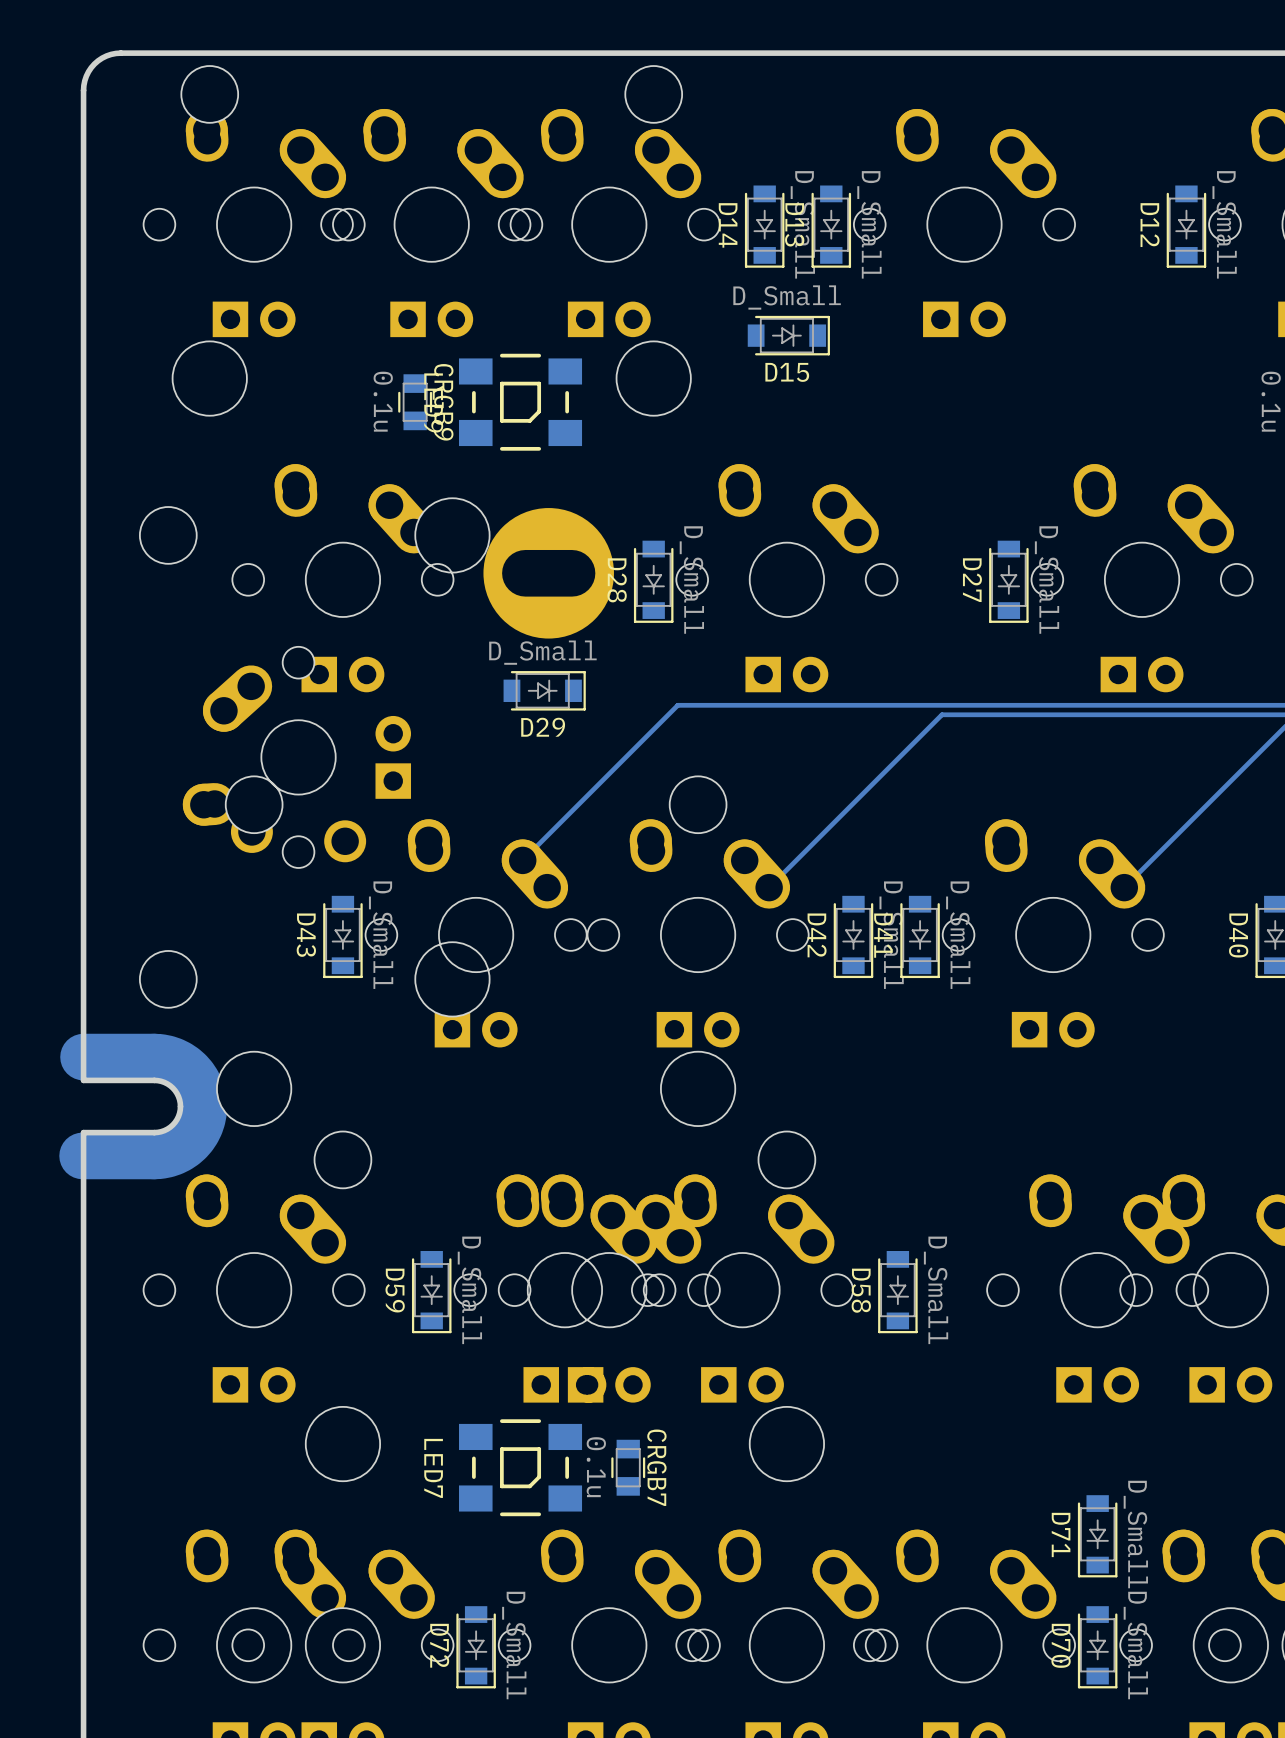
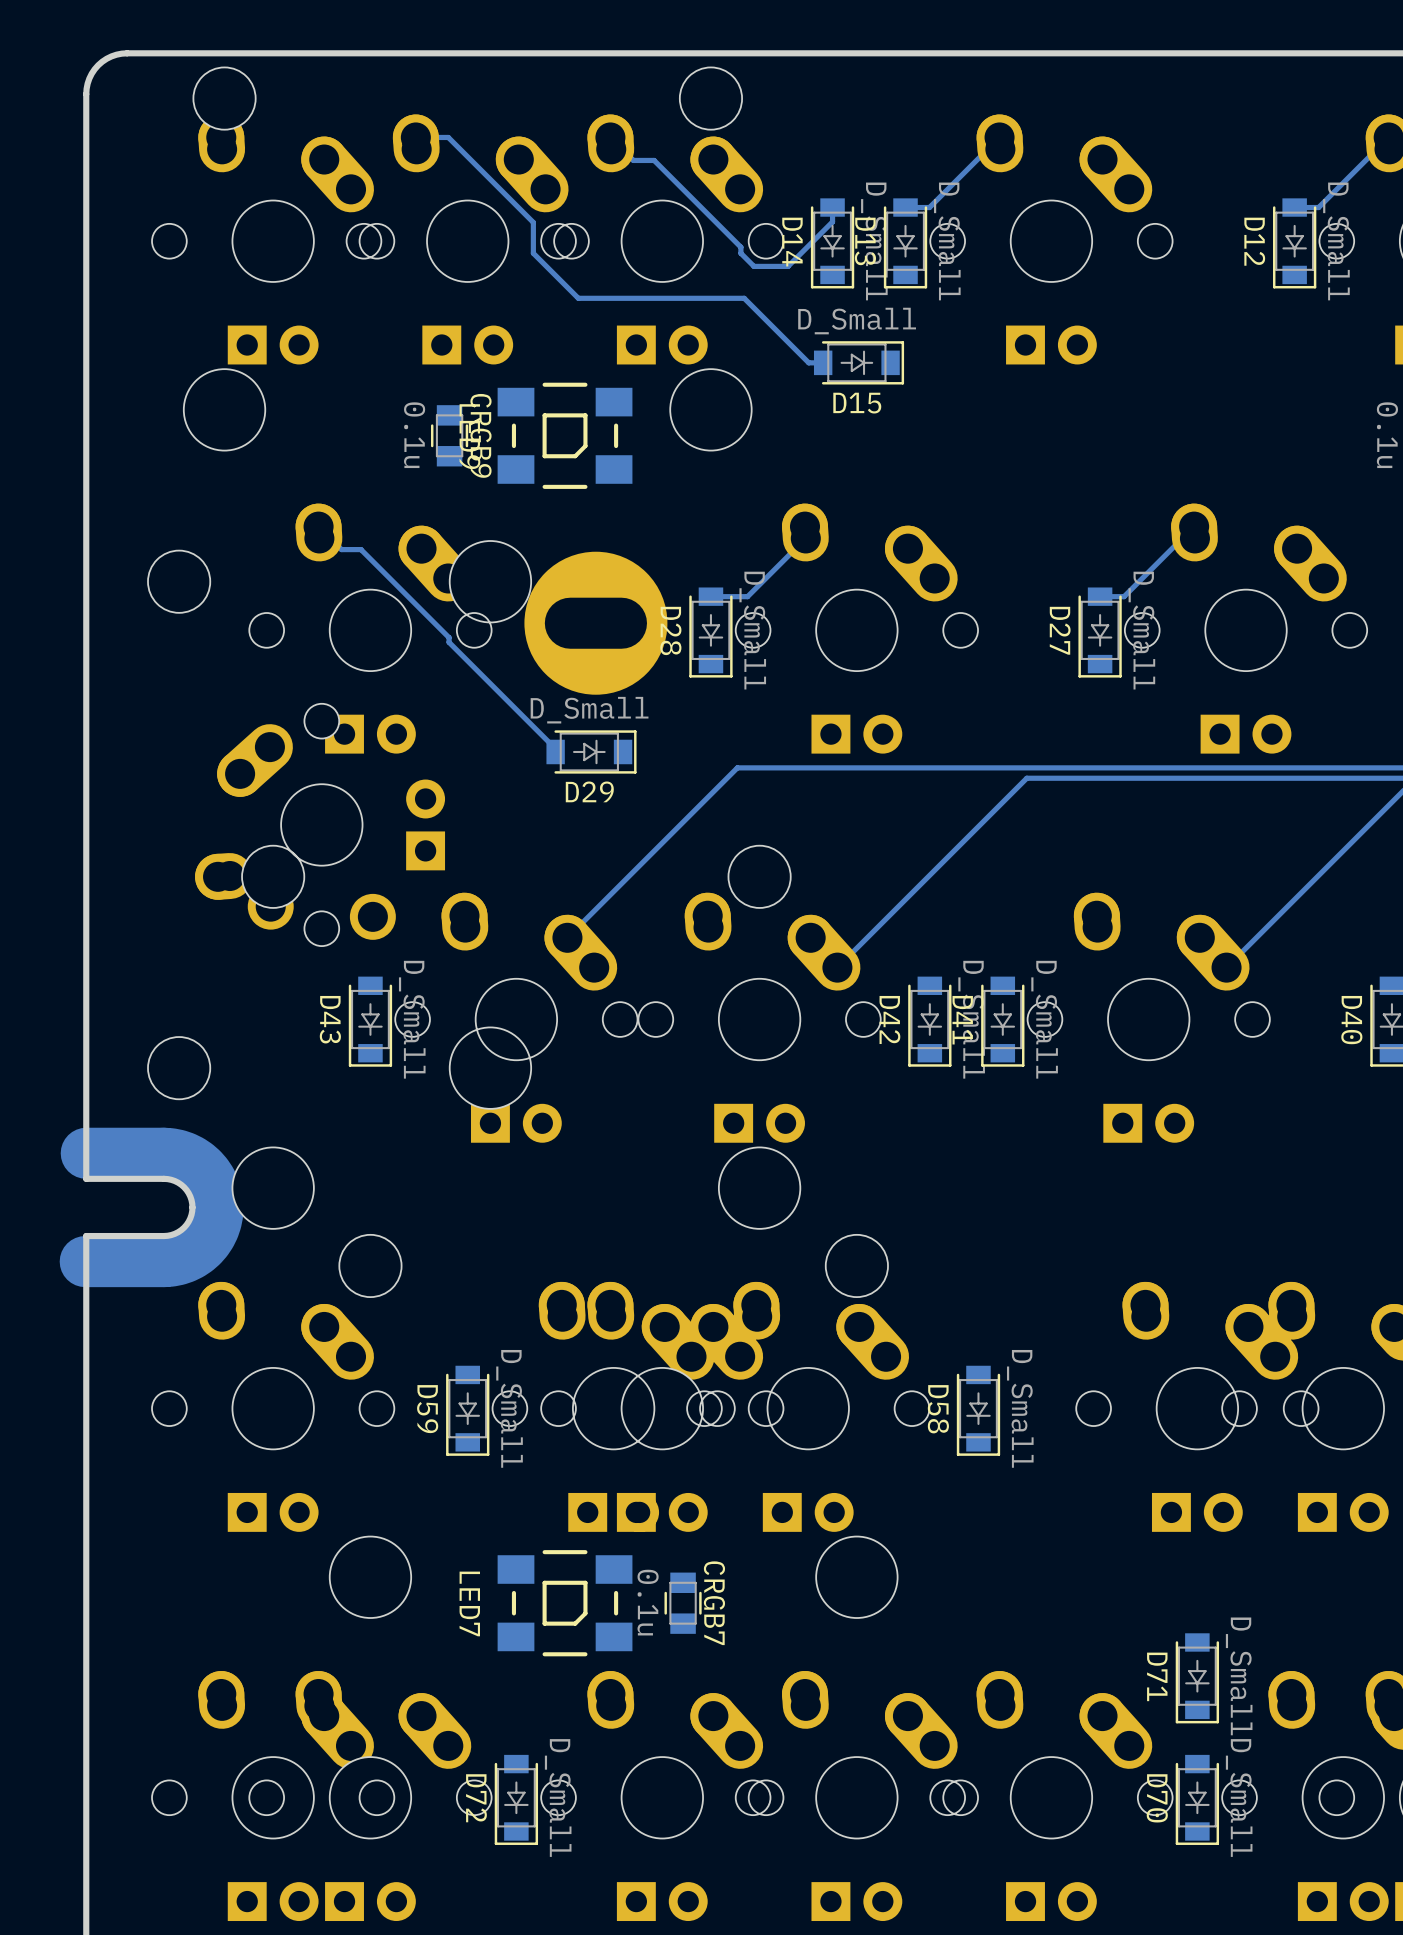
track: none -> (415, 137) (448, 137) (533, 222) (533, 253) (578, 298) (744, 298) (808, 362) (823, 362)
track: none -> (610, 137) (633, 160) (654, 160) (740, 247) (740, 253) (754, 266) (788, 266) (832, 221) (832, 207)
track: none -> (999, 137) (929, 207) (905, 207)
track: none -> (1388, 137) (1318, 207) (1294, 207)
track: none -> (318, 526) (341, 549) (361, 549) (449, 637) (449, 642) (555, 748) (555, 751)
track: none -> (1194, 526) (1124, 596) (1100, 596)
track: none -> (805, 538) (747, 596) (710, 596)

